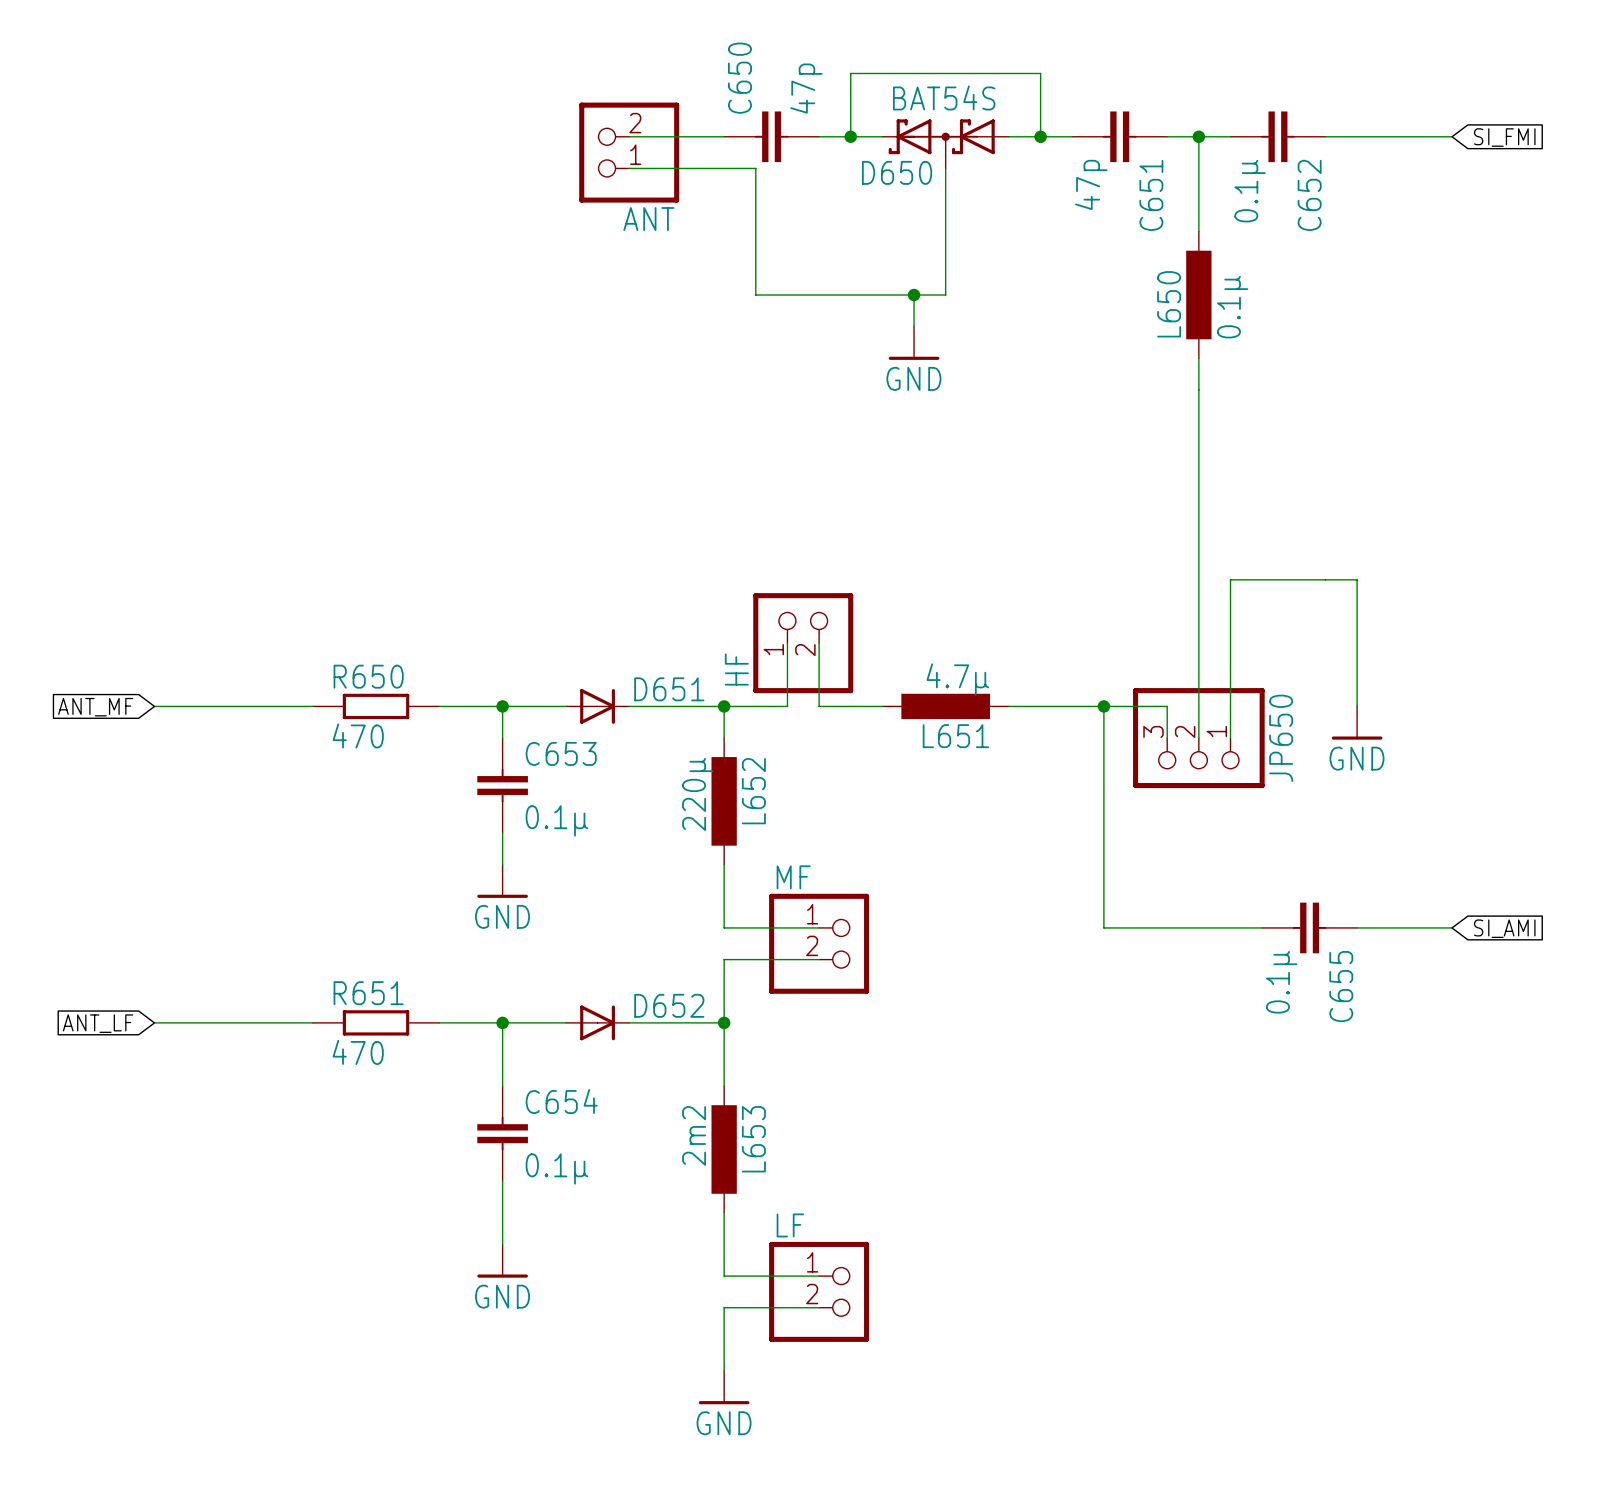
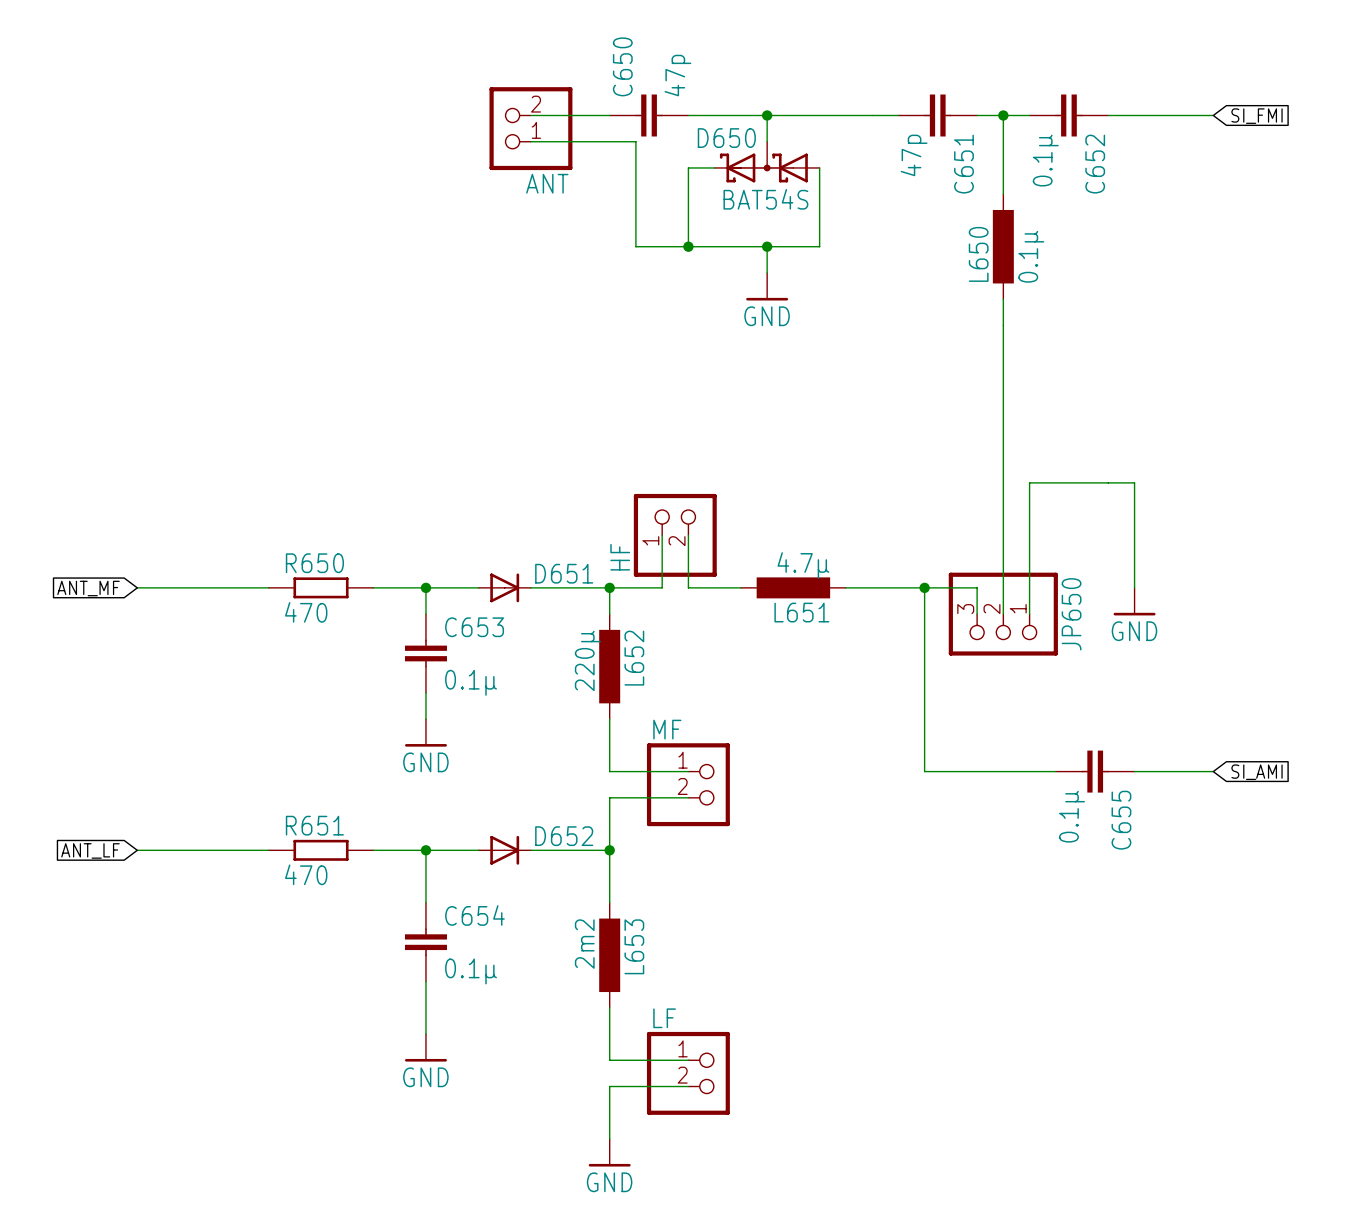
wire: (850, 136) (850, 73) (1040, 73) (1040, 136) -> none
junction: (850, 136) -> none
wire: none -> (767, 115) (767, 141)
junction: none -> (767, 115)
D650 flip: as is (941, 136) -> up-down (763, 167)
junction: (1040, 136) -> none
wire: (945, 168) (945, 295) -> (819, 167) (819, 246) (793, 246)
wire: none -> (714, 167) (688, 167) (688, 246)
junction: none -> (688, 246)

